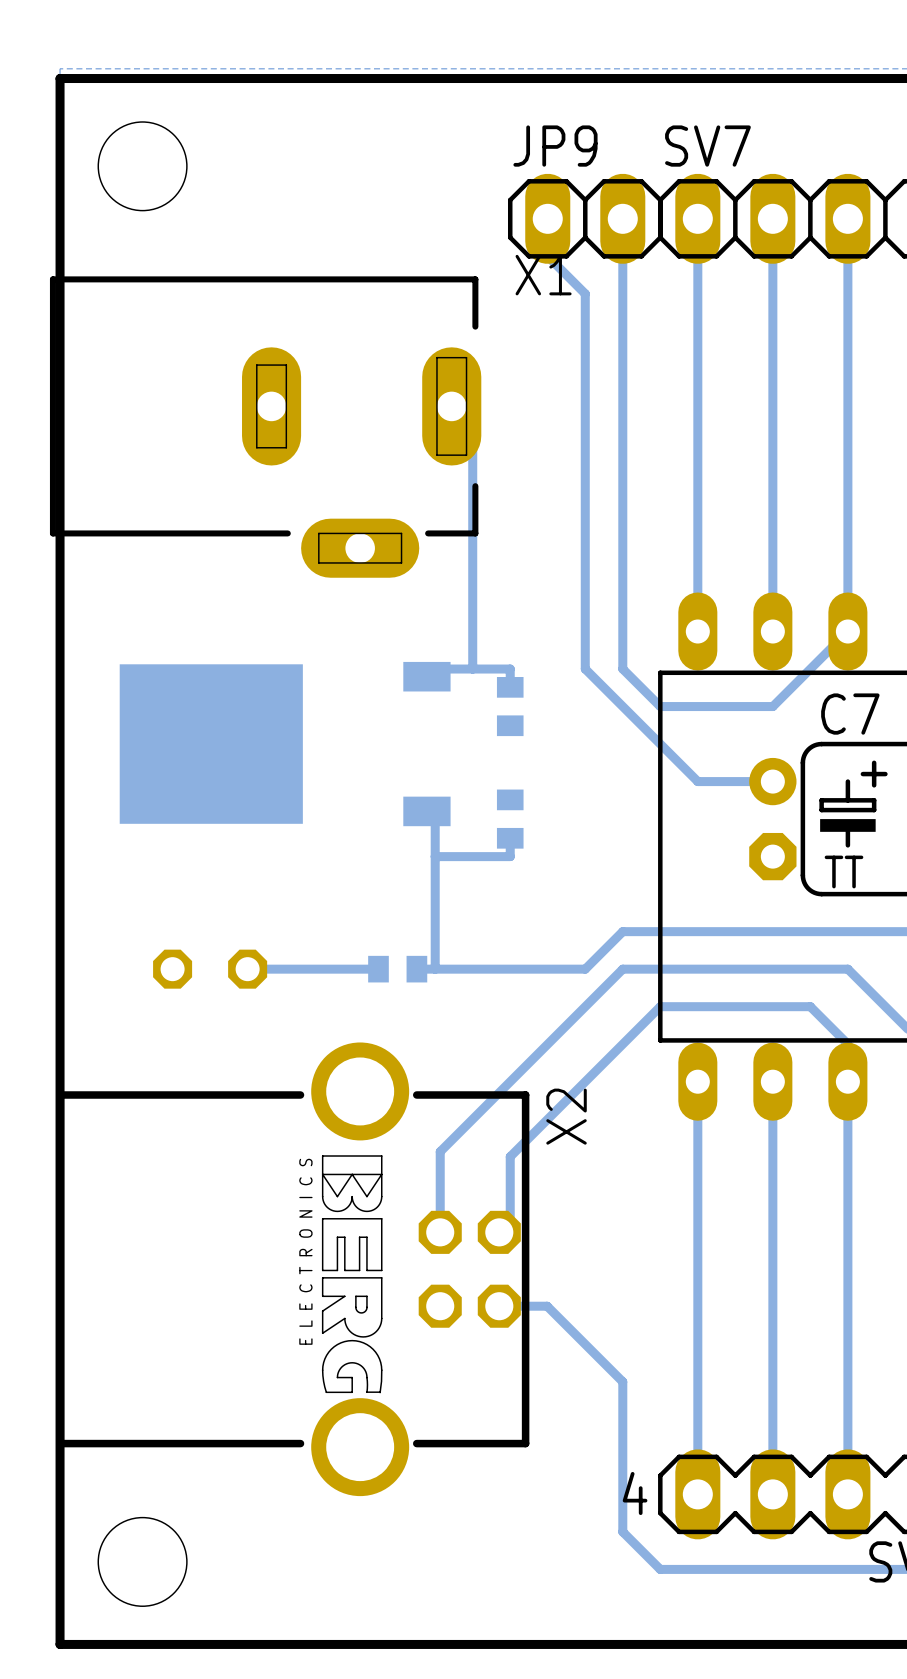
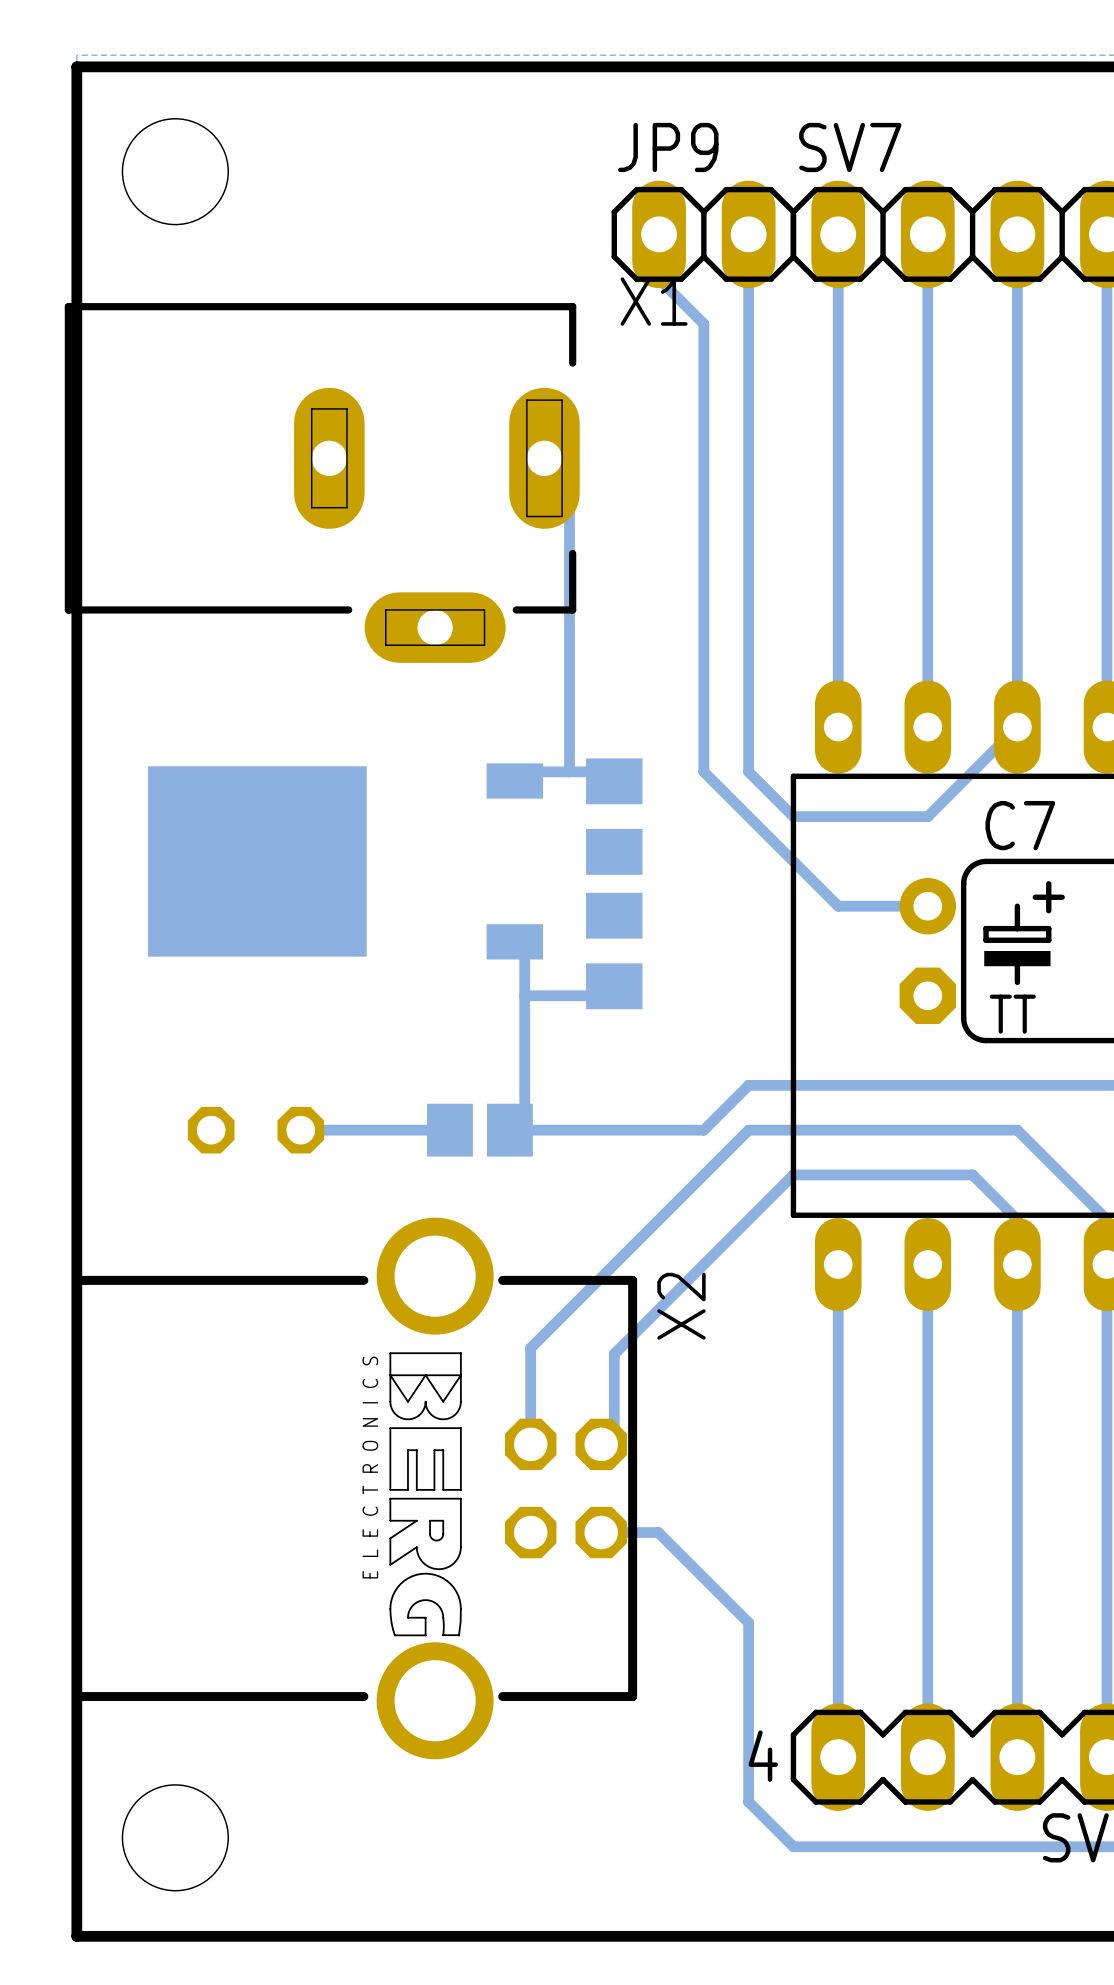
part footprint: [496, 677, 524, 737] -> [586, 758, 643, 875]
part footprint: [496, 789, 524, 849] -> [586, 892, 643, 1010]
part footprint: [368, 955, 428, 983] -> [427, 1103, 533, 1157]

